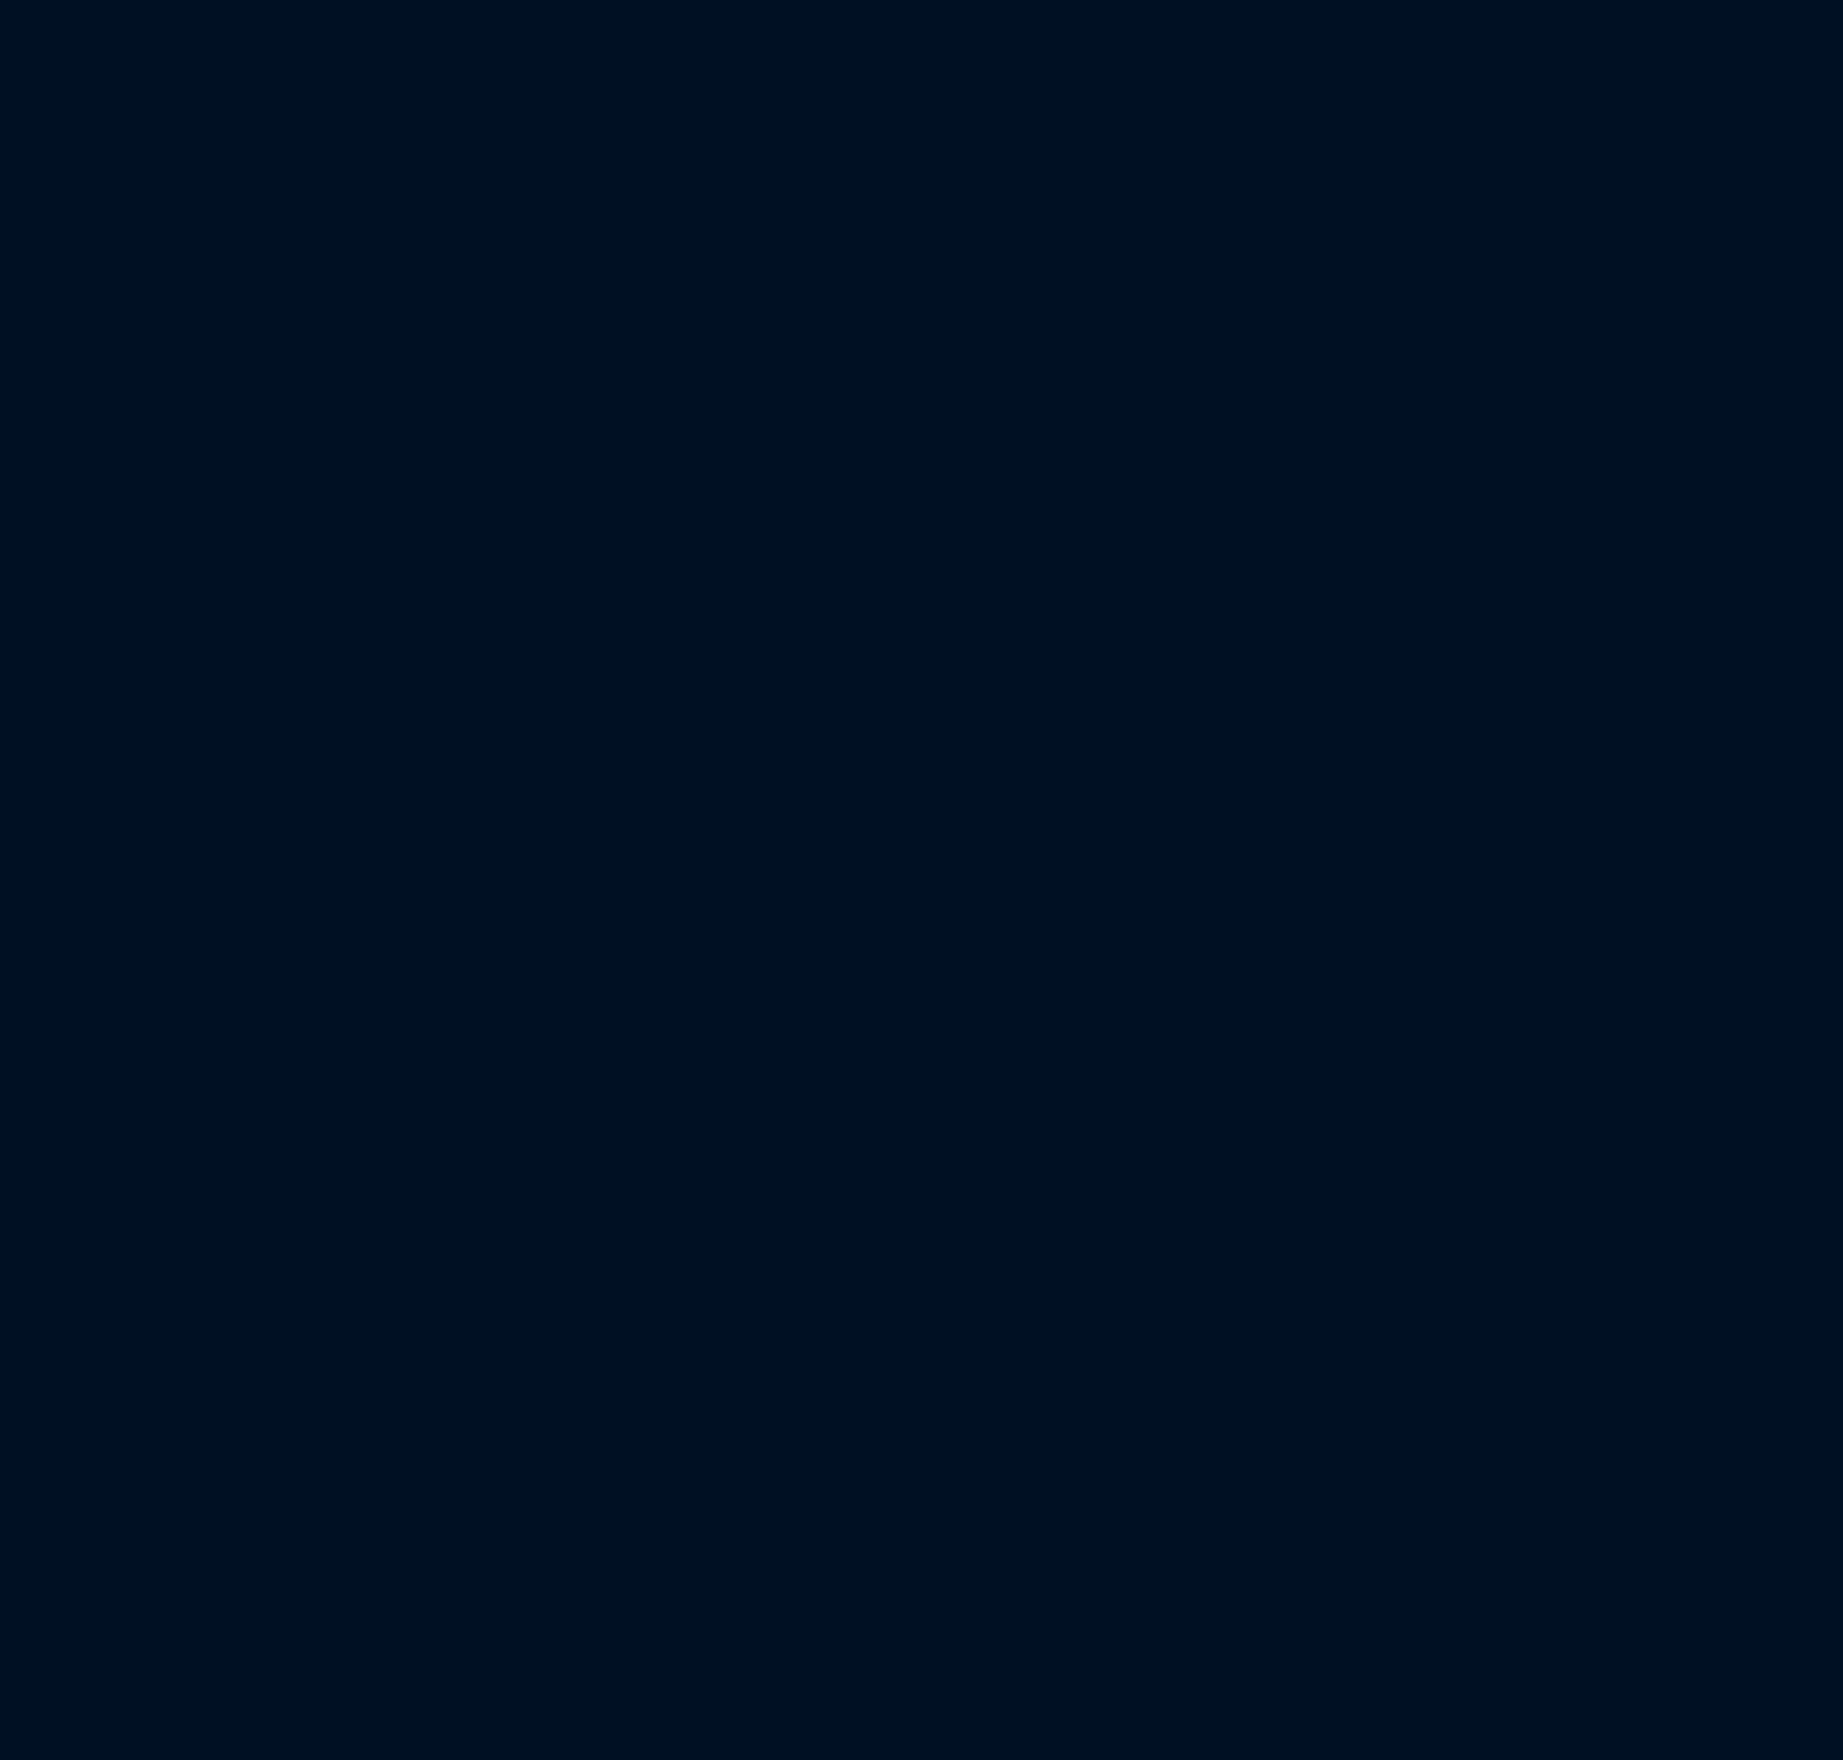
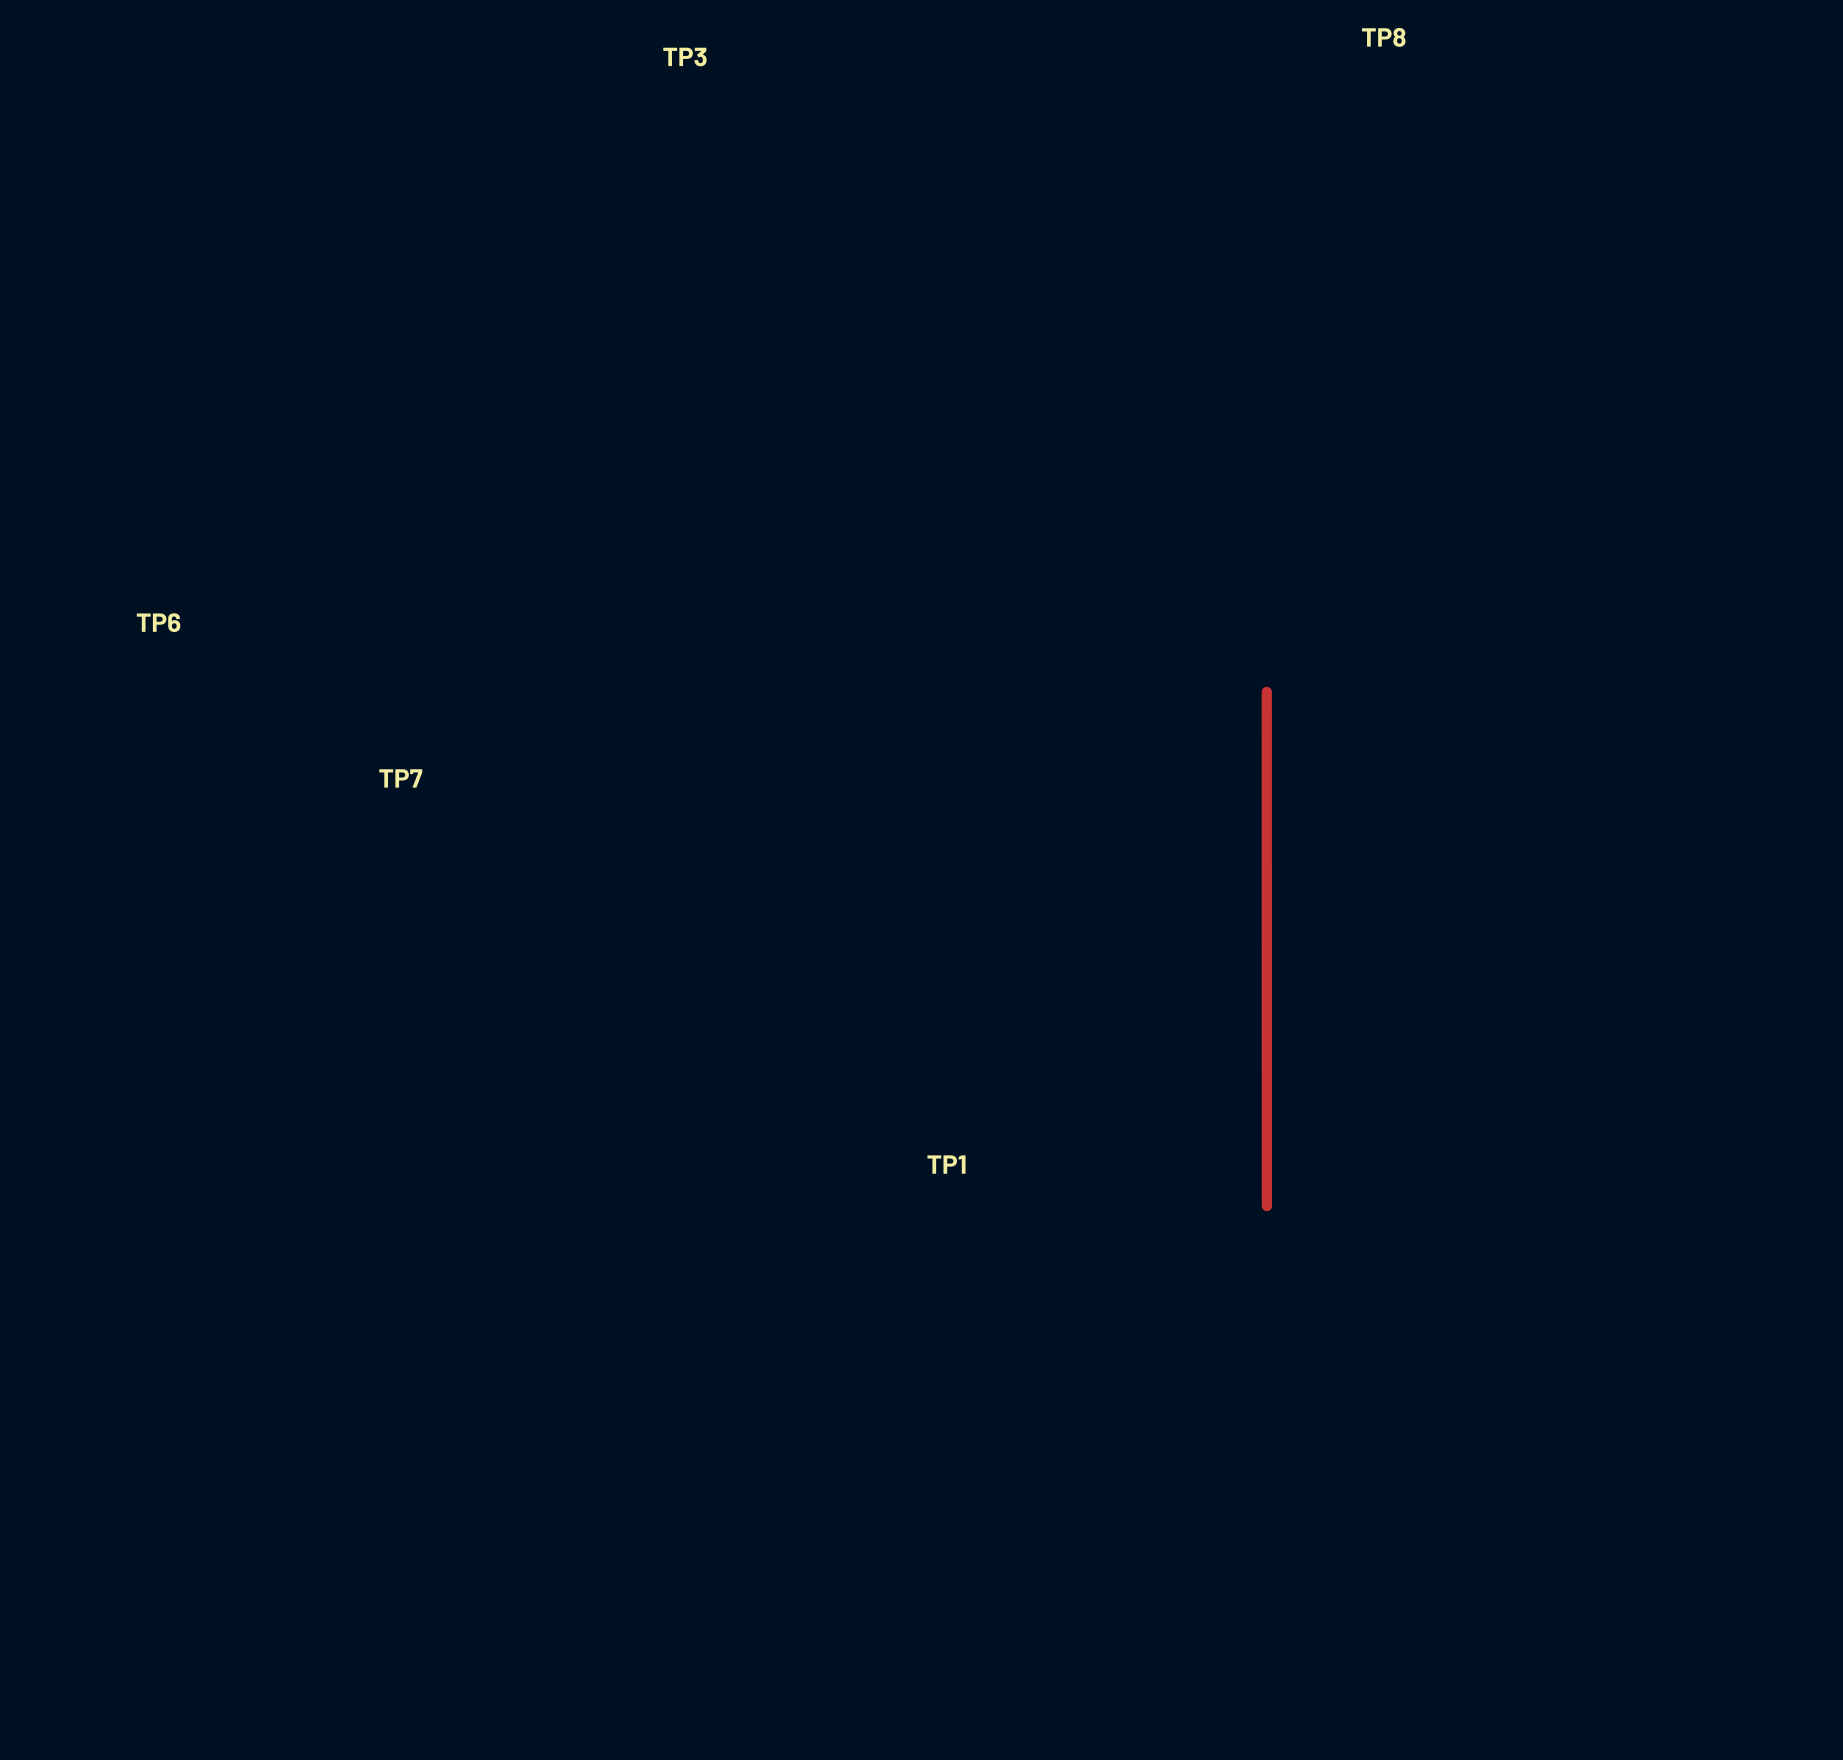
text: none -> TP8 (1383, 37)
text: none -> TP3 (684, 57)
text: none -> TP6 (158, 622)
track: none -> (1266, 691) (1266, 1206)
text: none -> TP7 (400, 778)
text: none -> TP1 (946, 1164)

